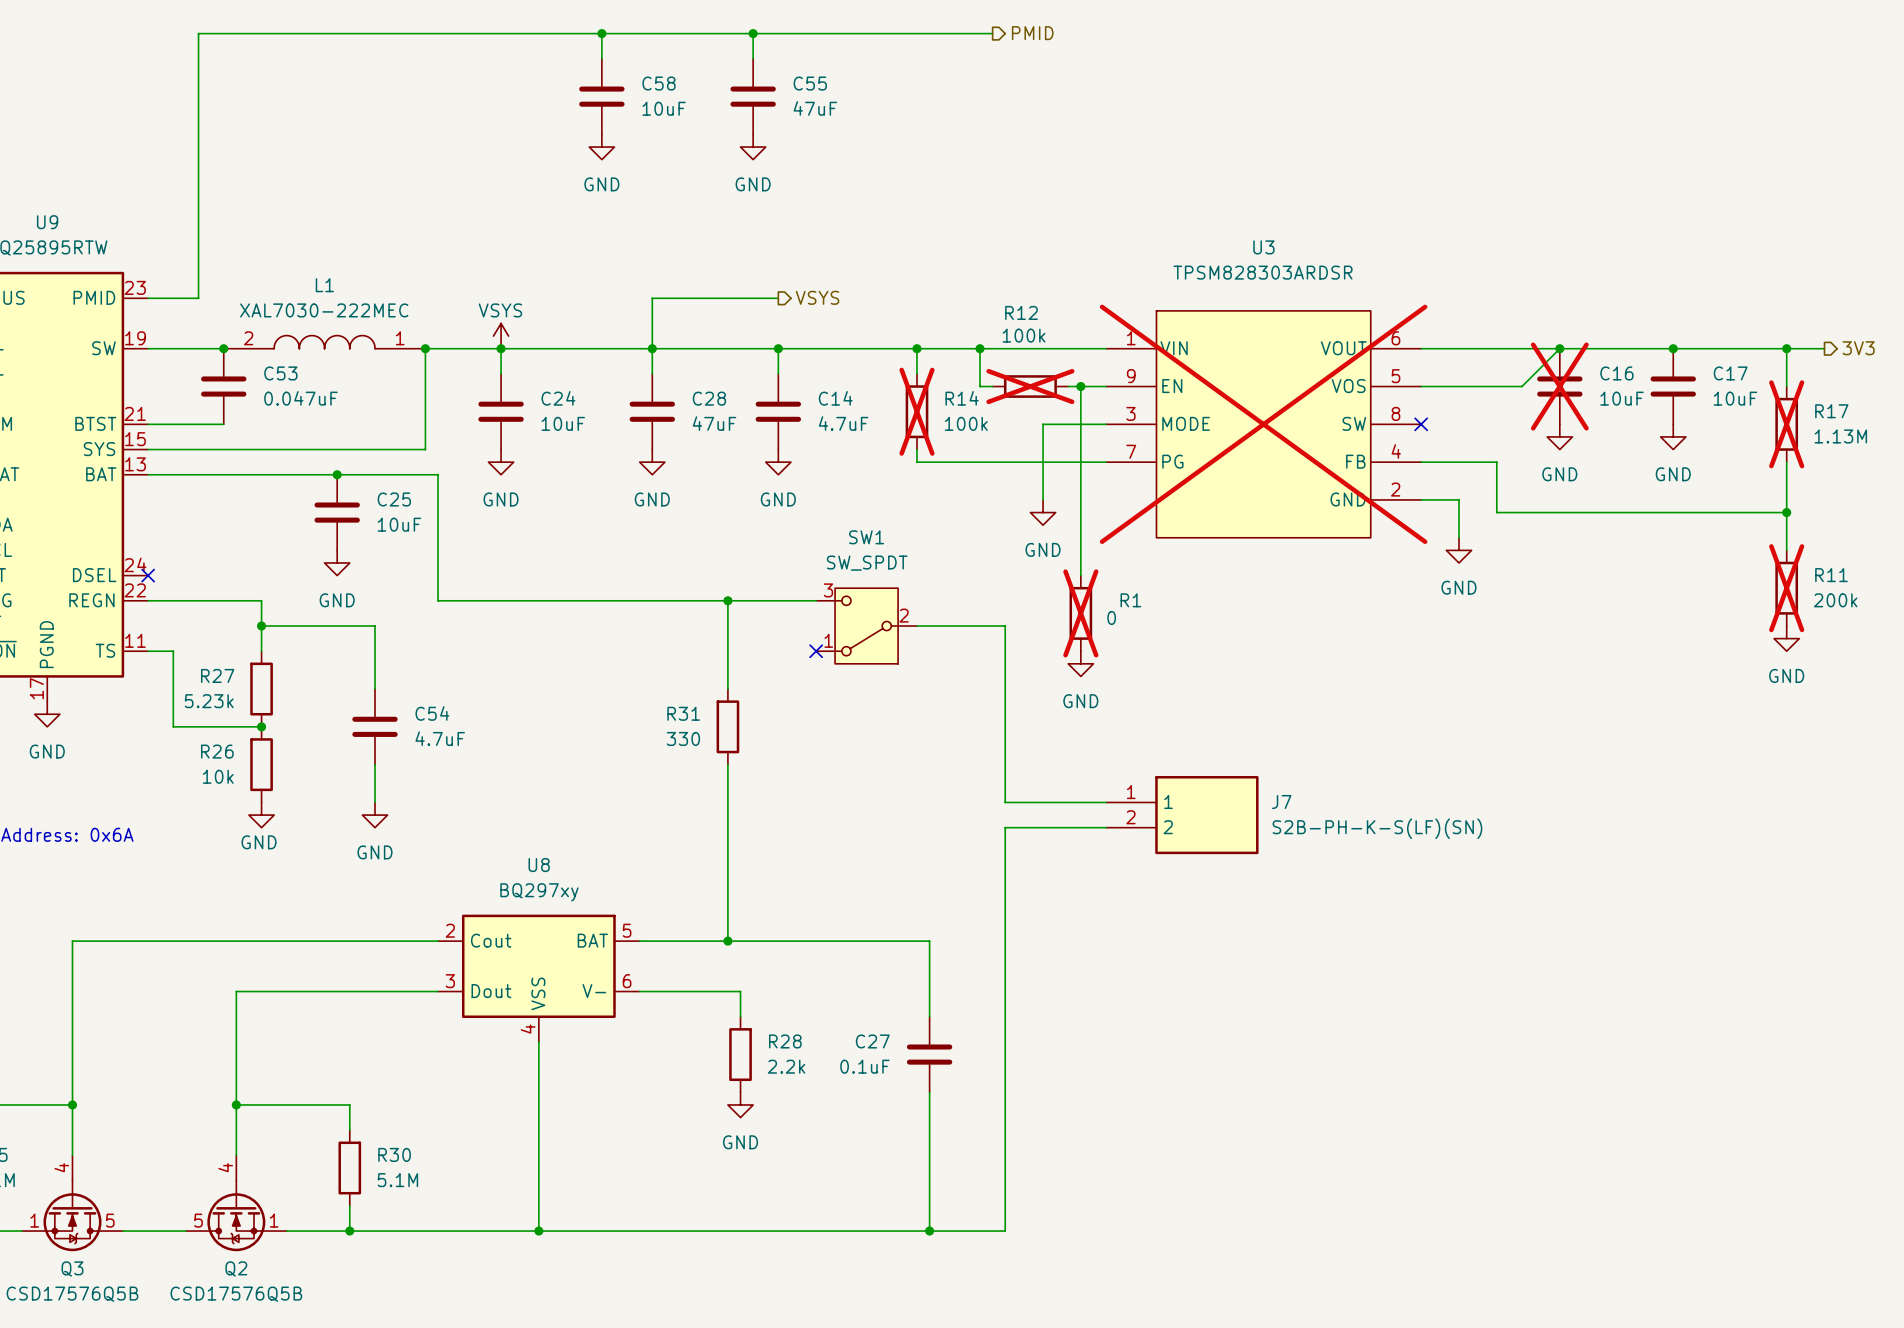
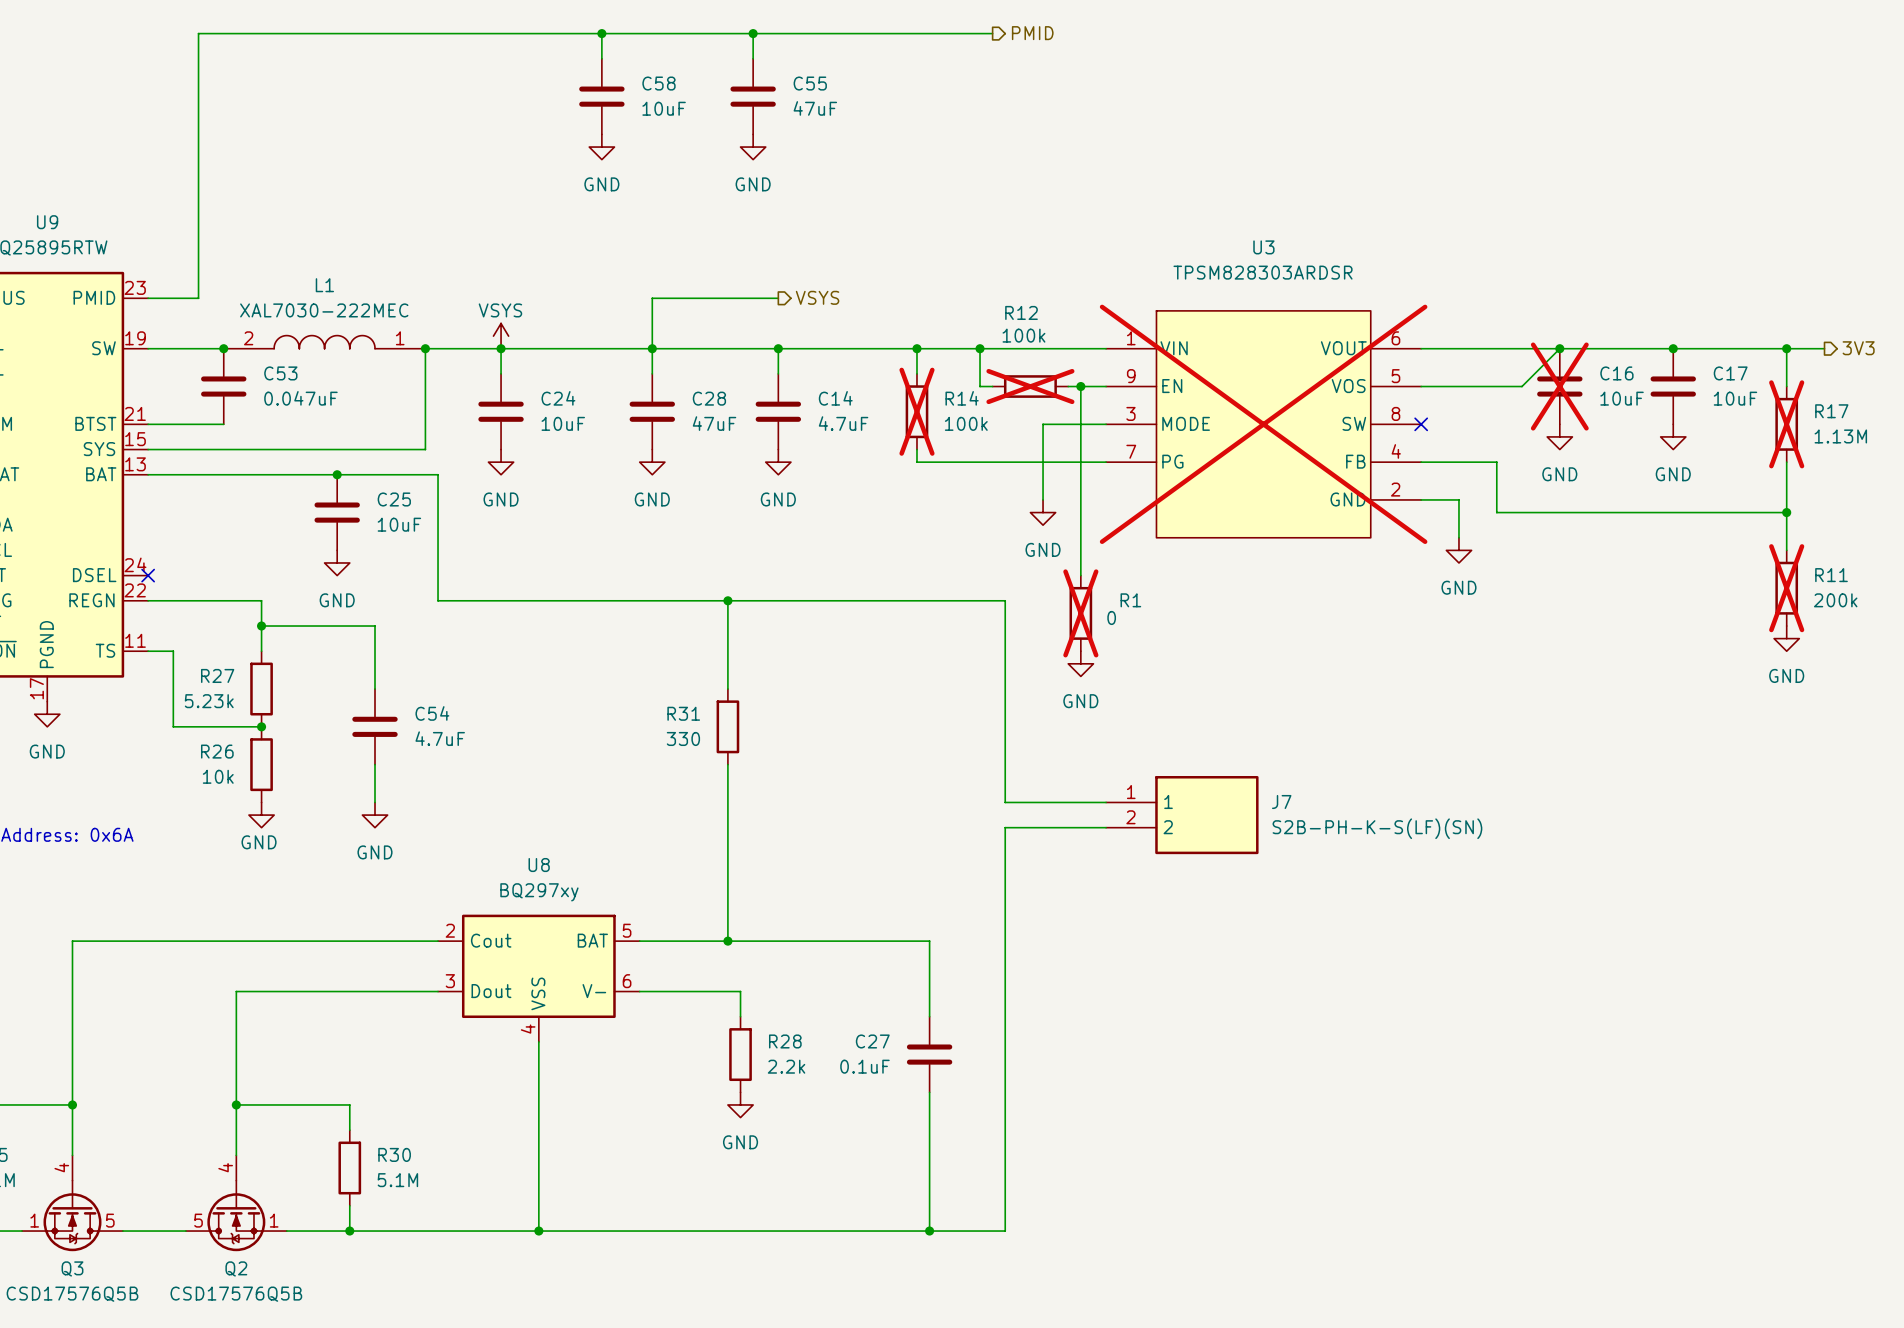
SW1: SW_SPDT (866, 626) -> none
wire: (916, 626) (1005, 626) -> (816, 600) (1005, 600) (1005, 626)
no-connect mark: (816, 651) -> none

